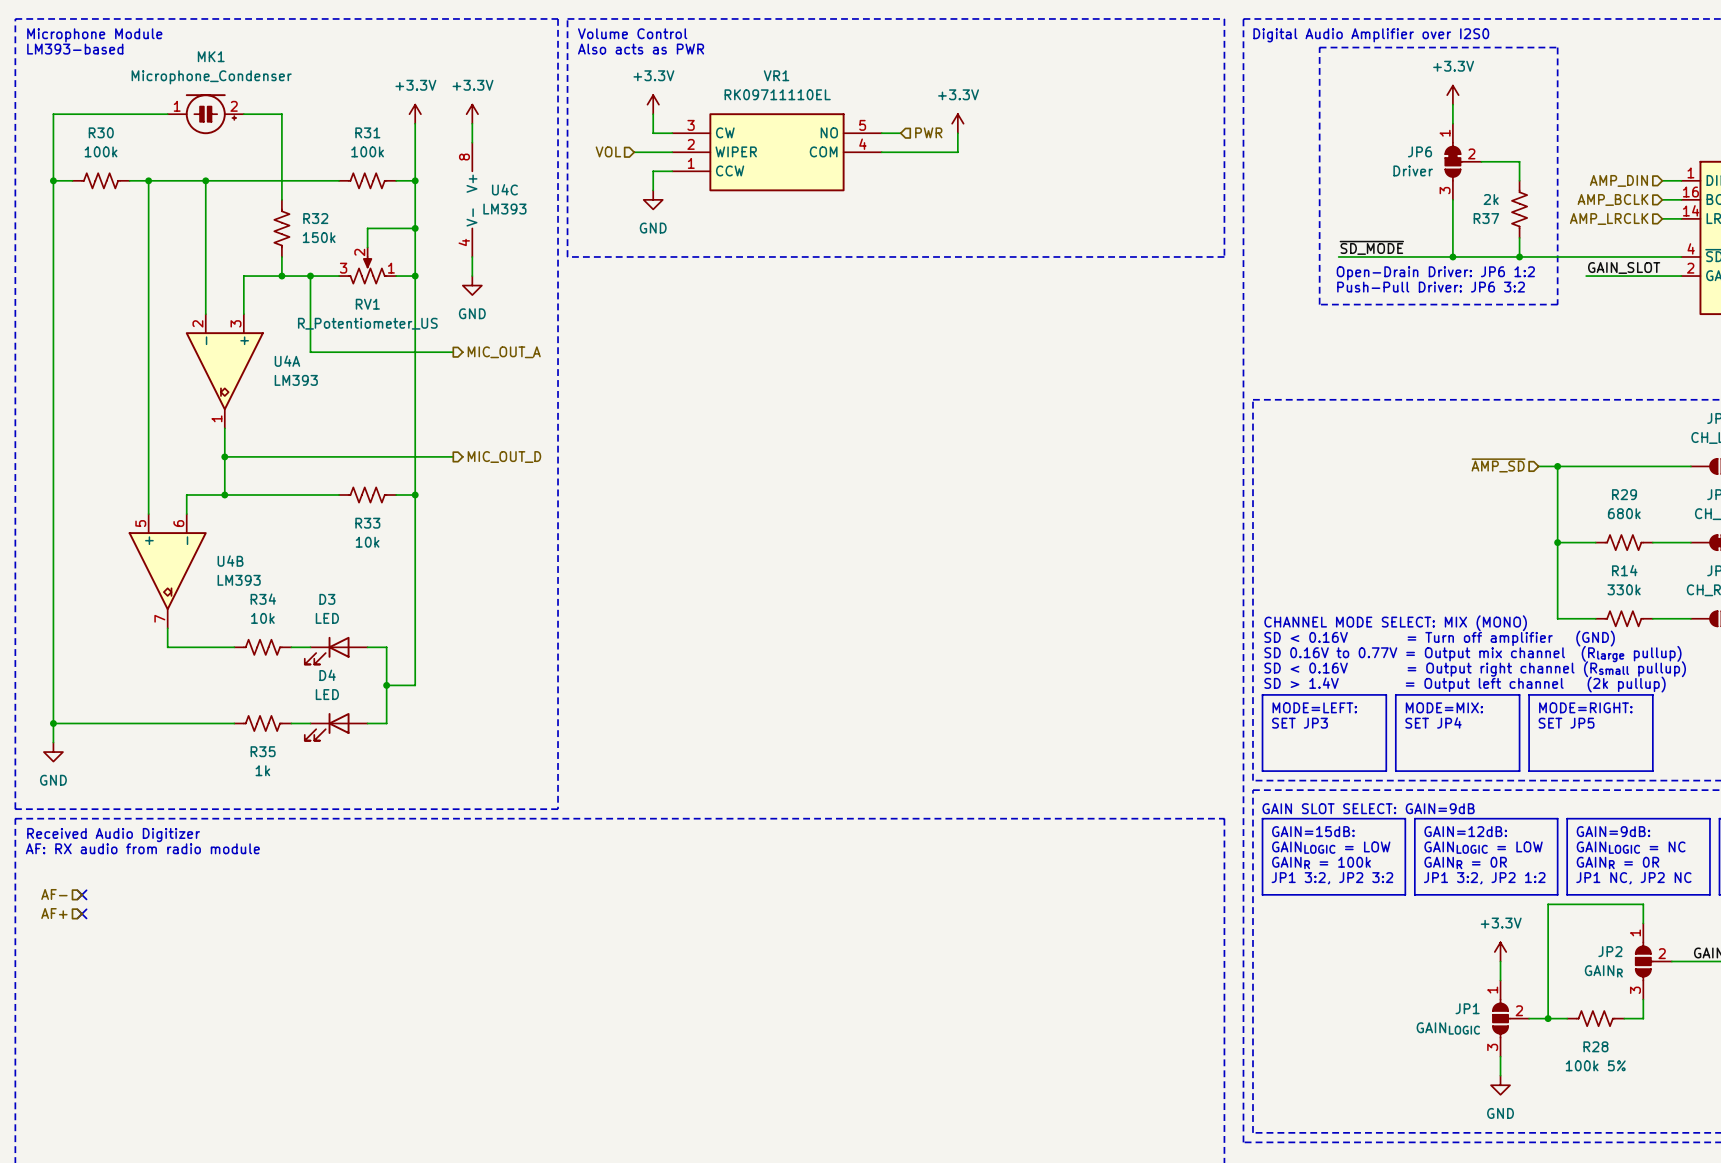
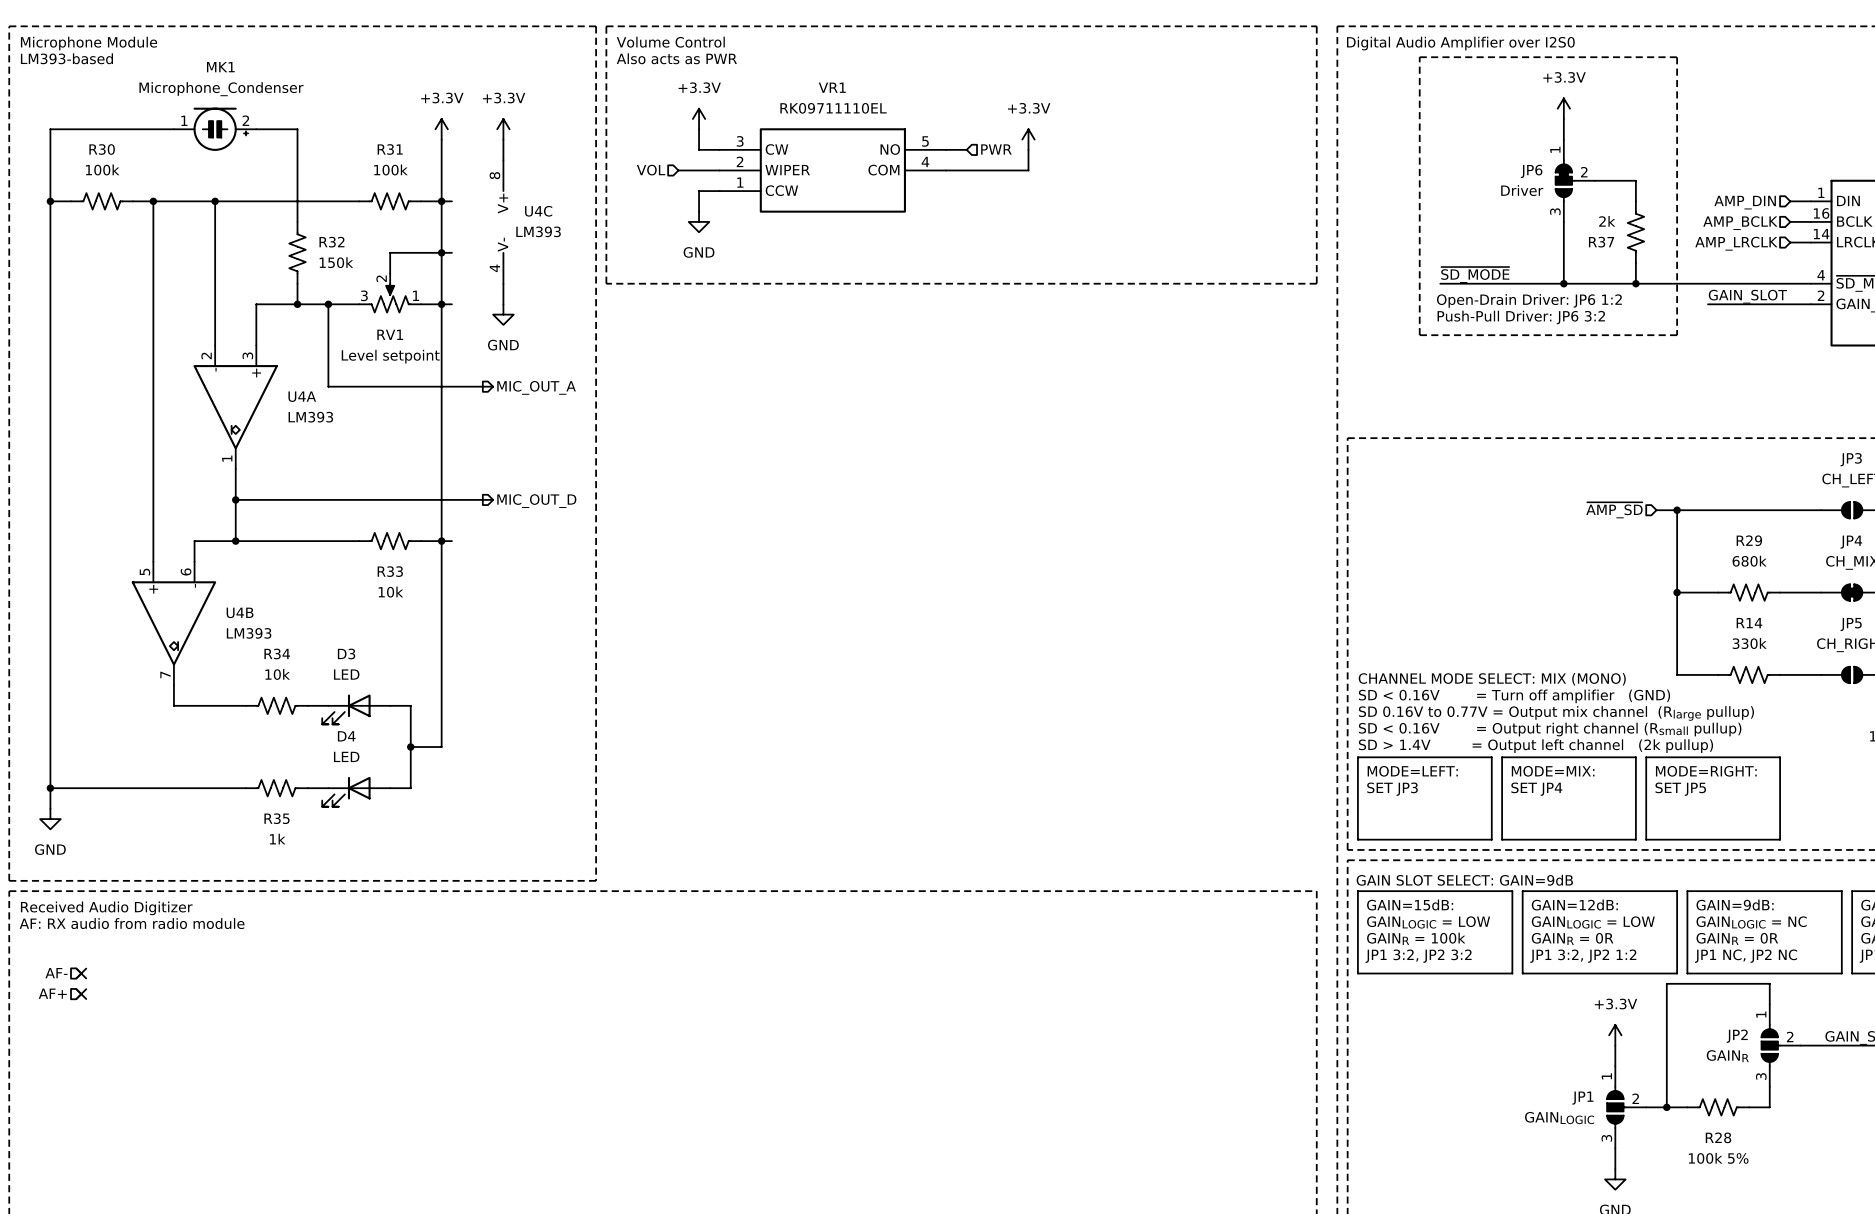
wire: none -> (441, 201) (451, 201)
wire: none -> (441, 252) (451, 252)
wire: none -> (441, 304) (451, 304)
RV1 value: R_Potentiometer_US (367, 323) -> Level setpoint (390, 356)
wire: none -> (482, 386) (493, 386)
wire: none -> (482, 499) (493, 499)
wire: none -> (441, 541) (451, 541)

